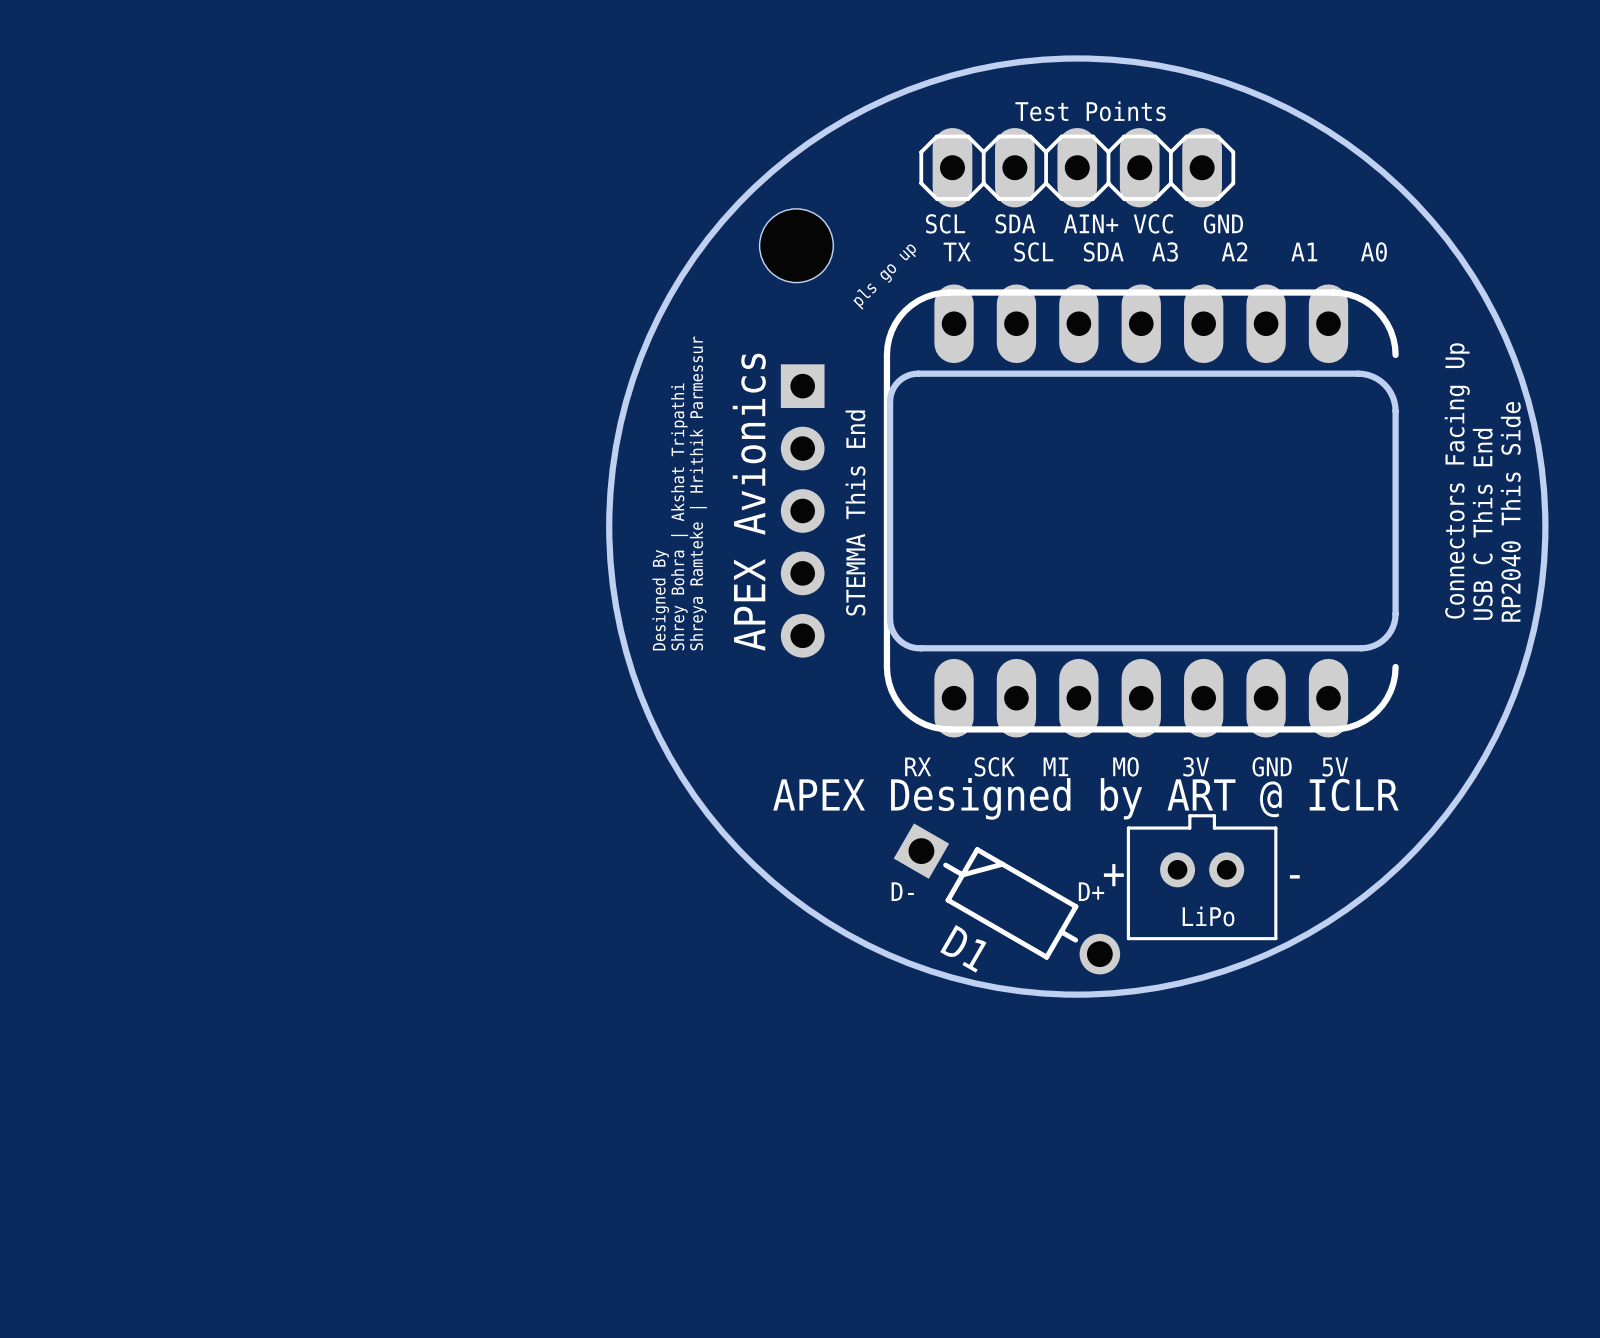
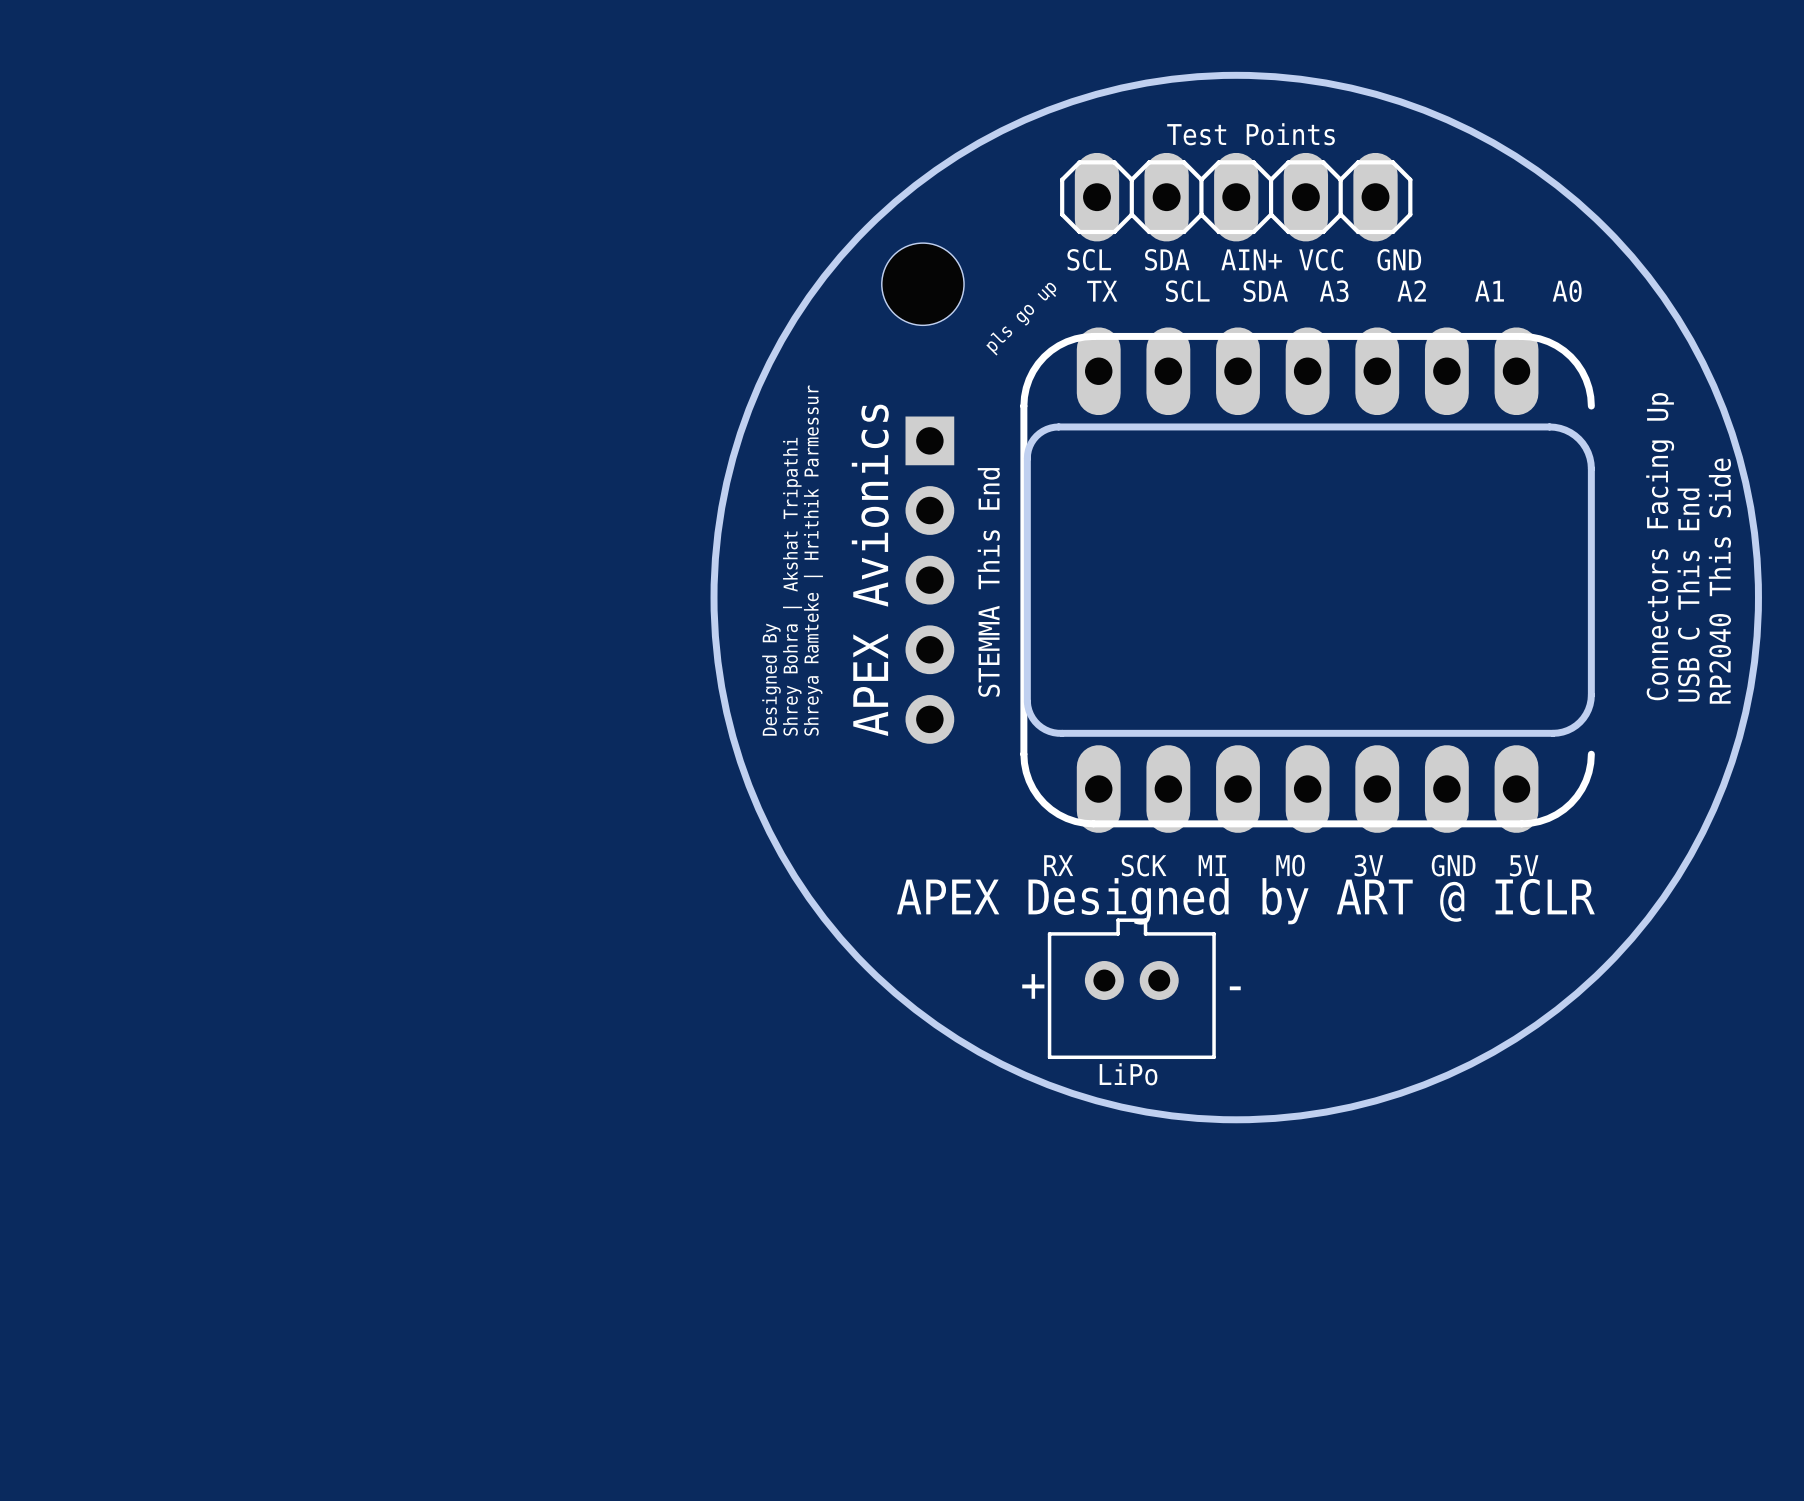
part position: (1202, 877) -> (1131, 988)
text: D- (902, 891) -> none
text: D+ (1091, 891) -> none
D1: (1006, 898) -> none
text position: LiPo (1208, 916) -> LiPo (1128, 1074)

